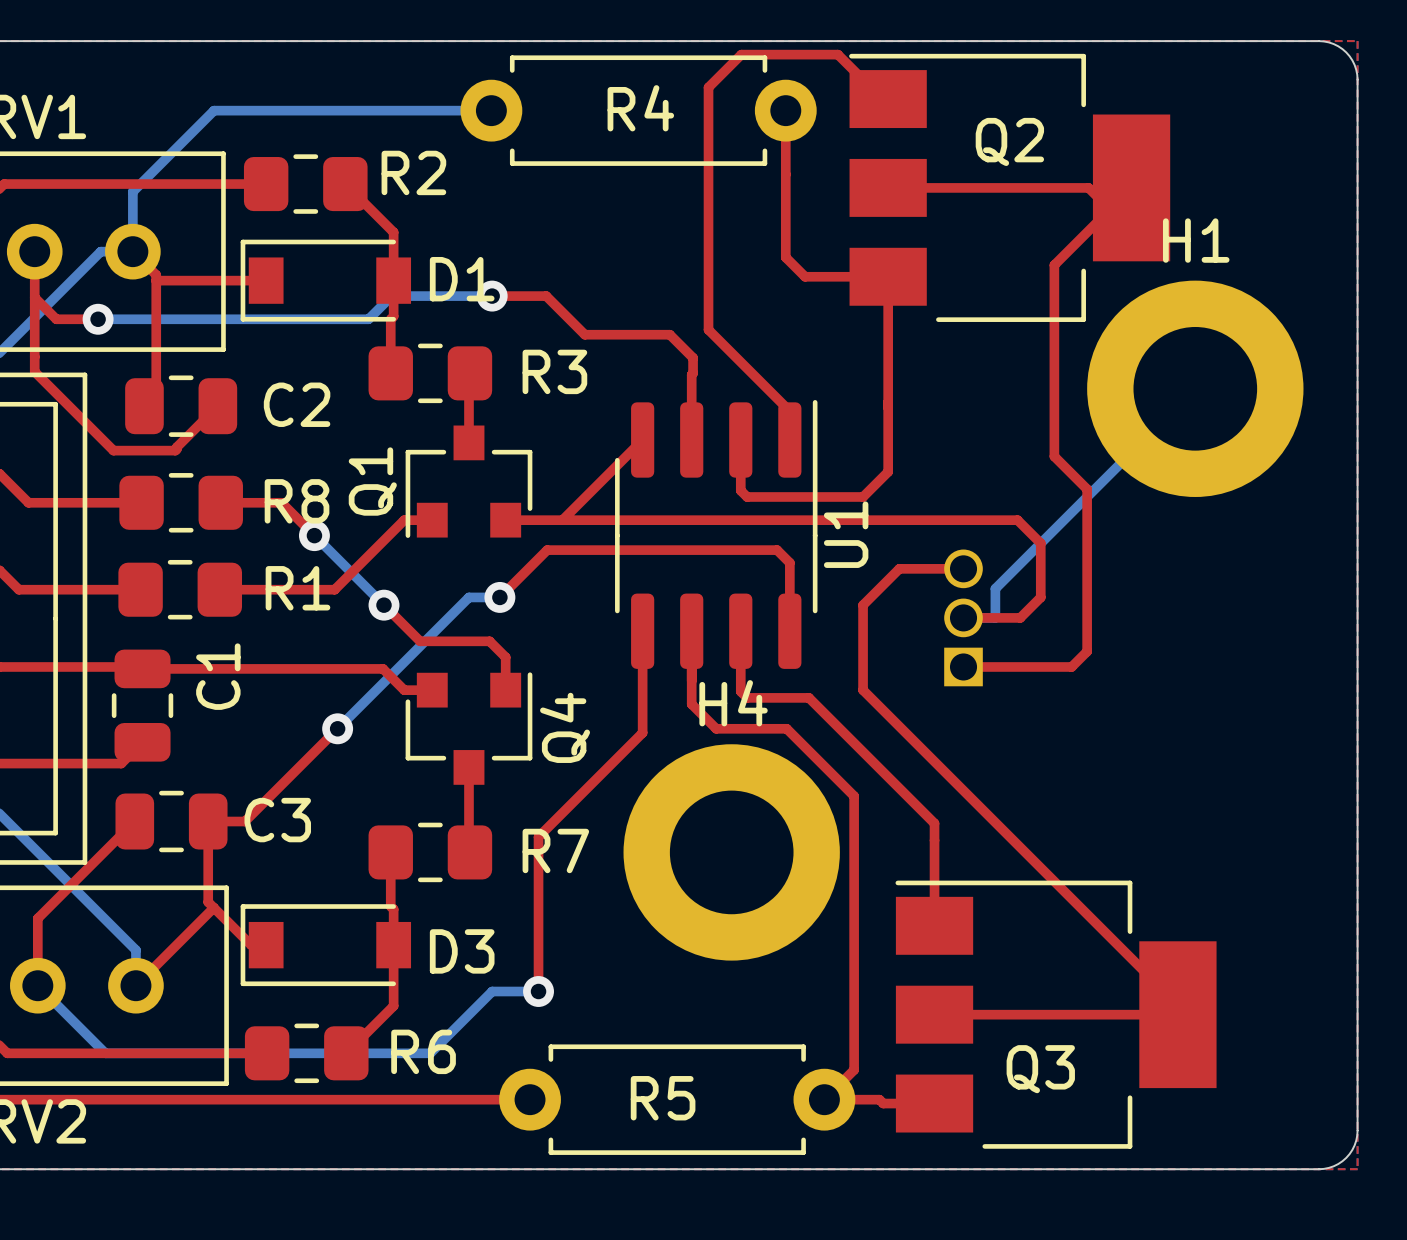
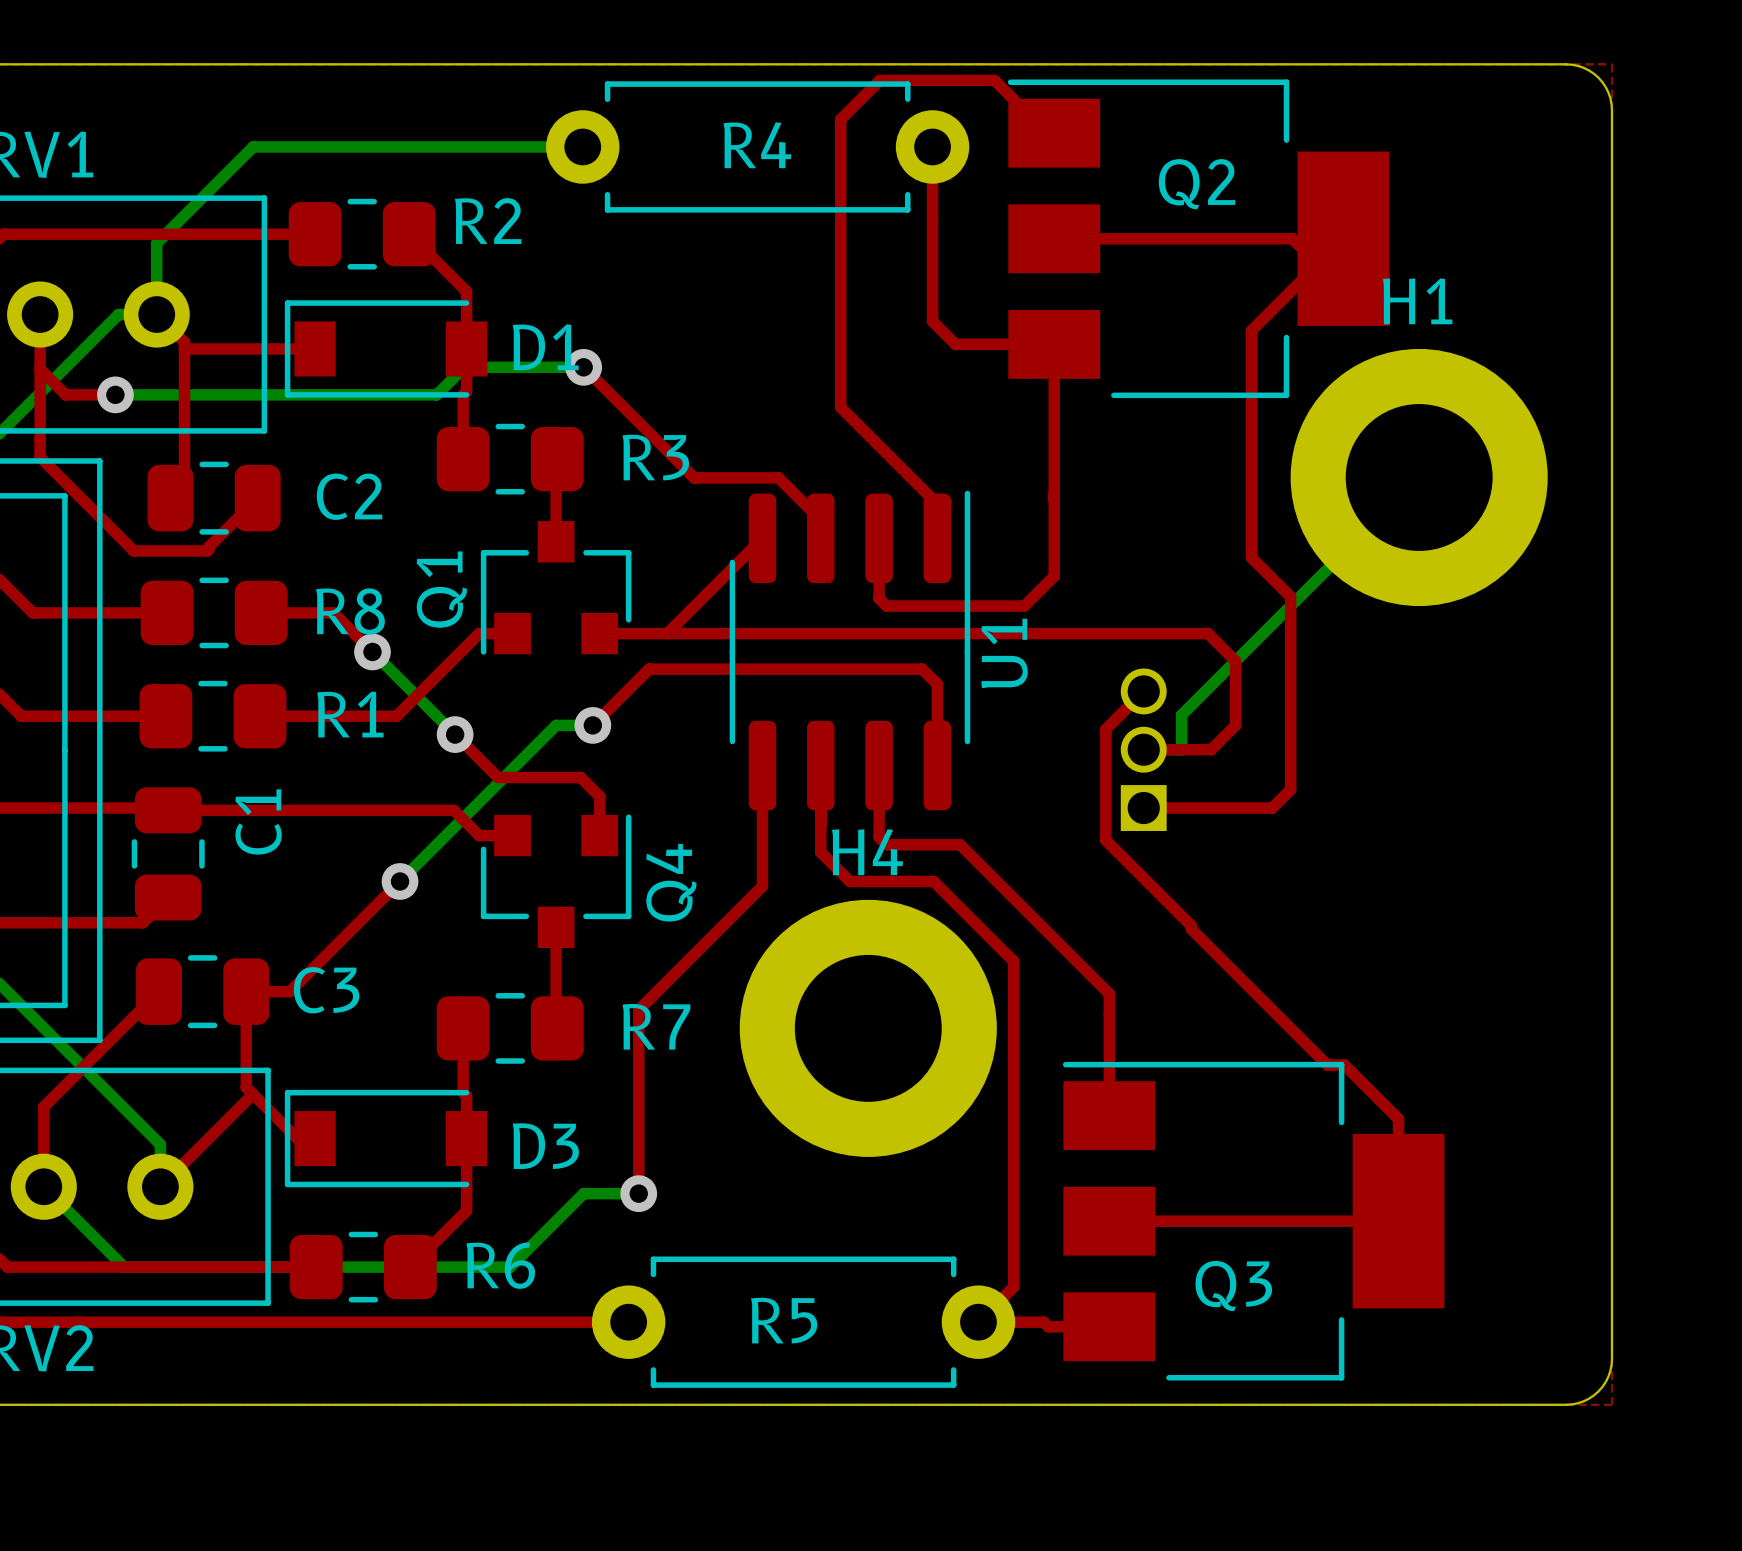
top track: (492, 296) (546, 296) (584, 334) (669, 334) (693, 357) (691, 424) -> (583, 367) (694, 477) (778, 477) (820, 520)
top track: (963, 568) (899, 568) (863, 605) (863, 690) (1177, 1005) -> (1143, 691) (1105, 729) (1105, 840) (1327, 1065) (1344, 1065) (1398, 1119) (1398, 1209)

